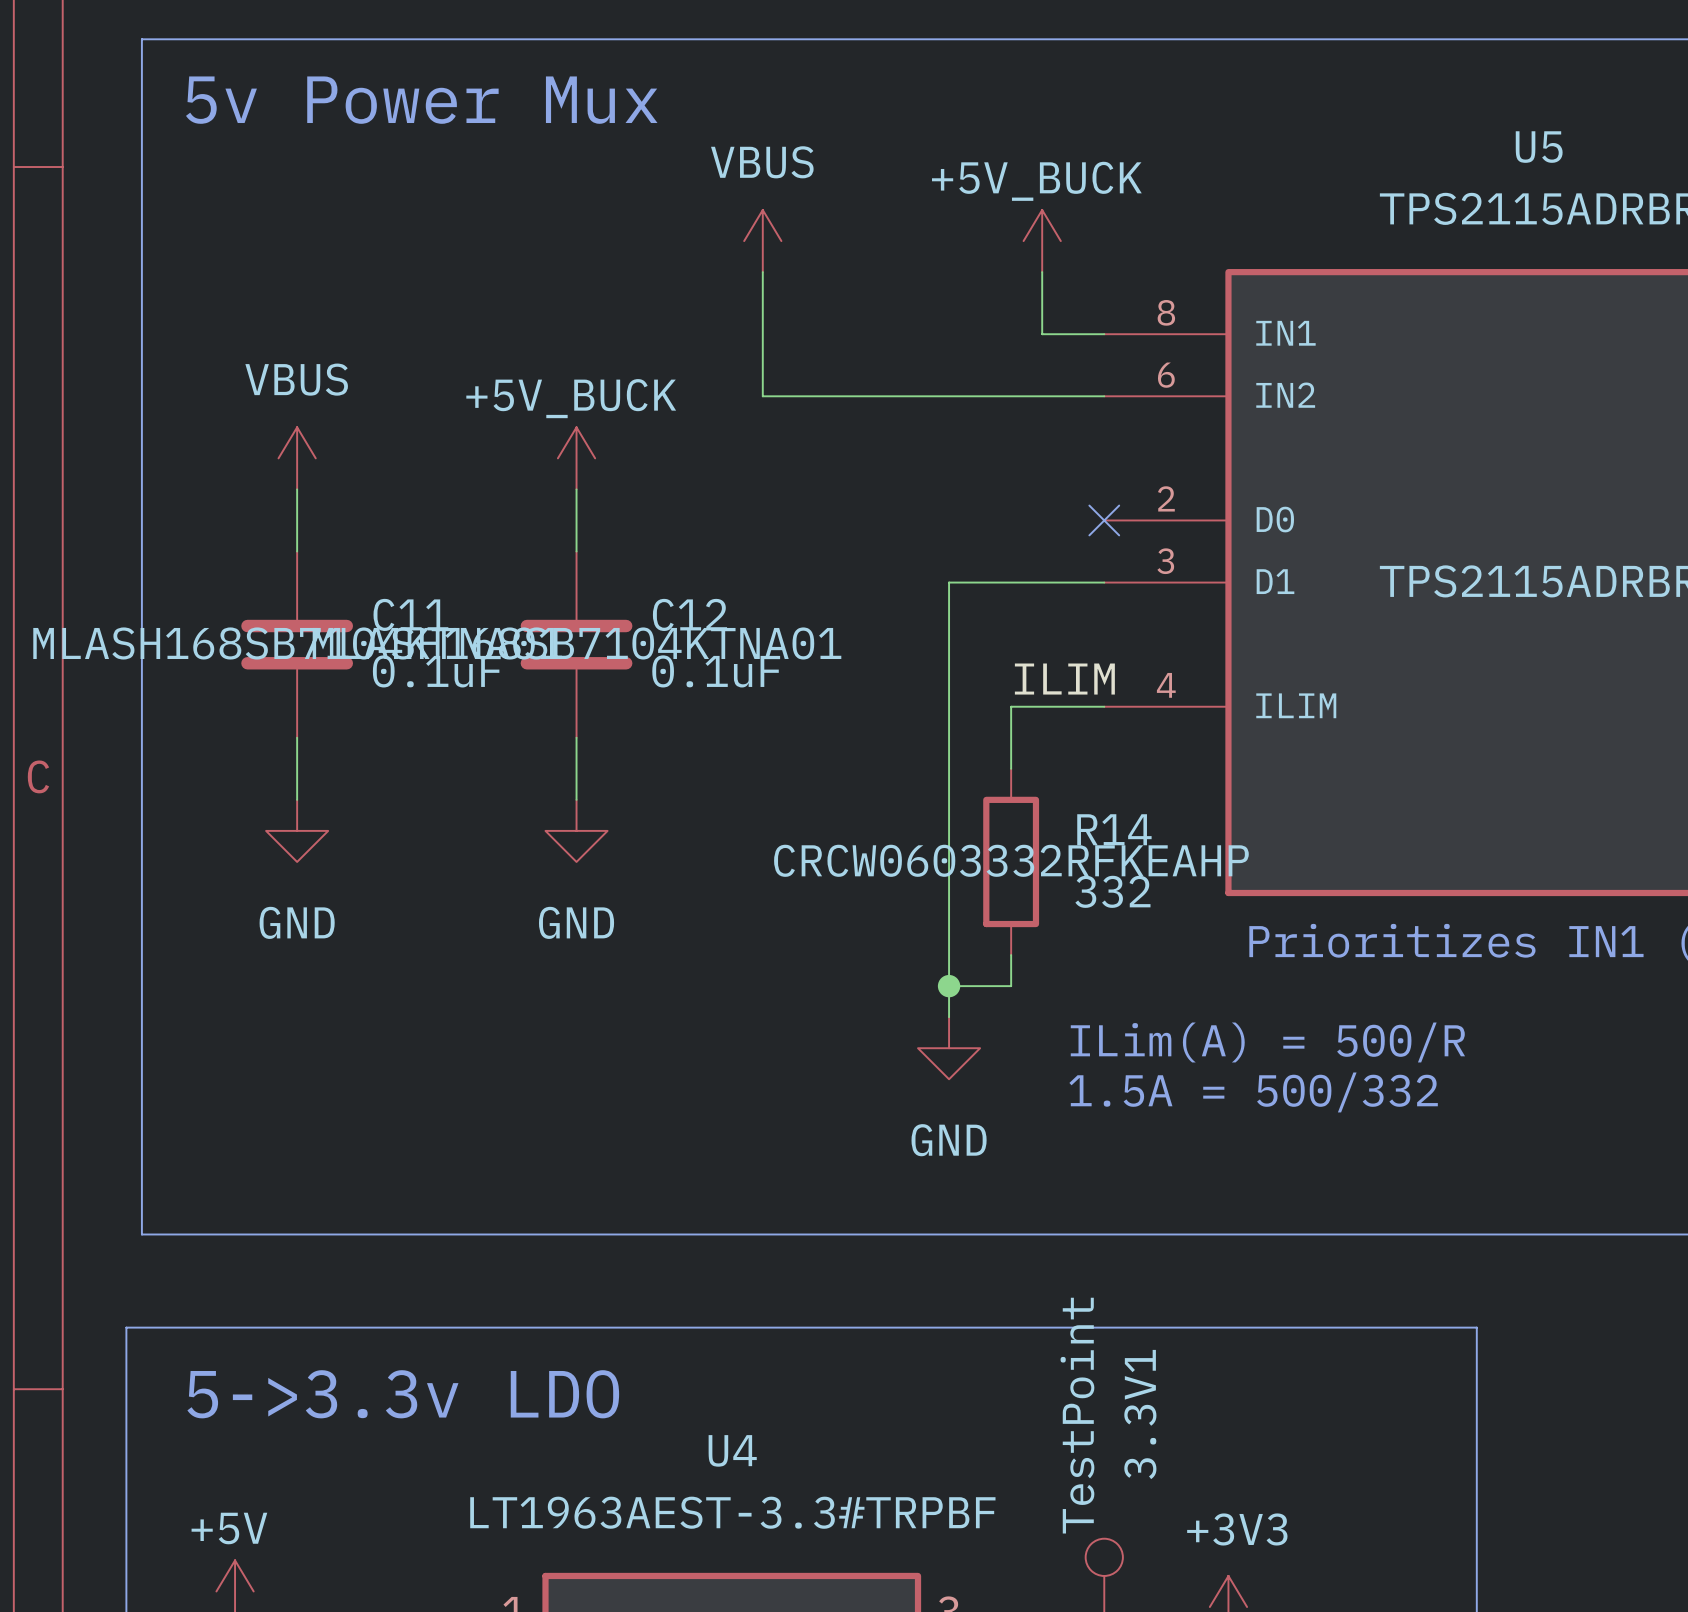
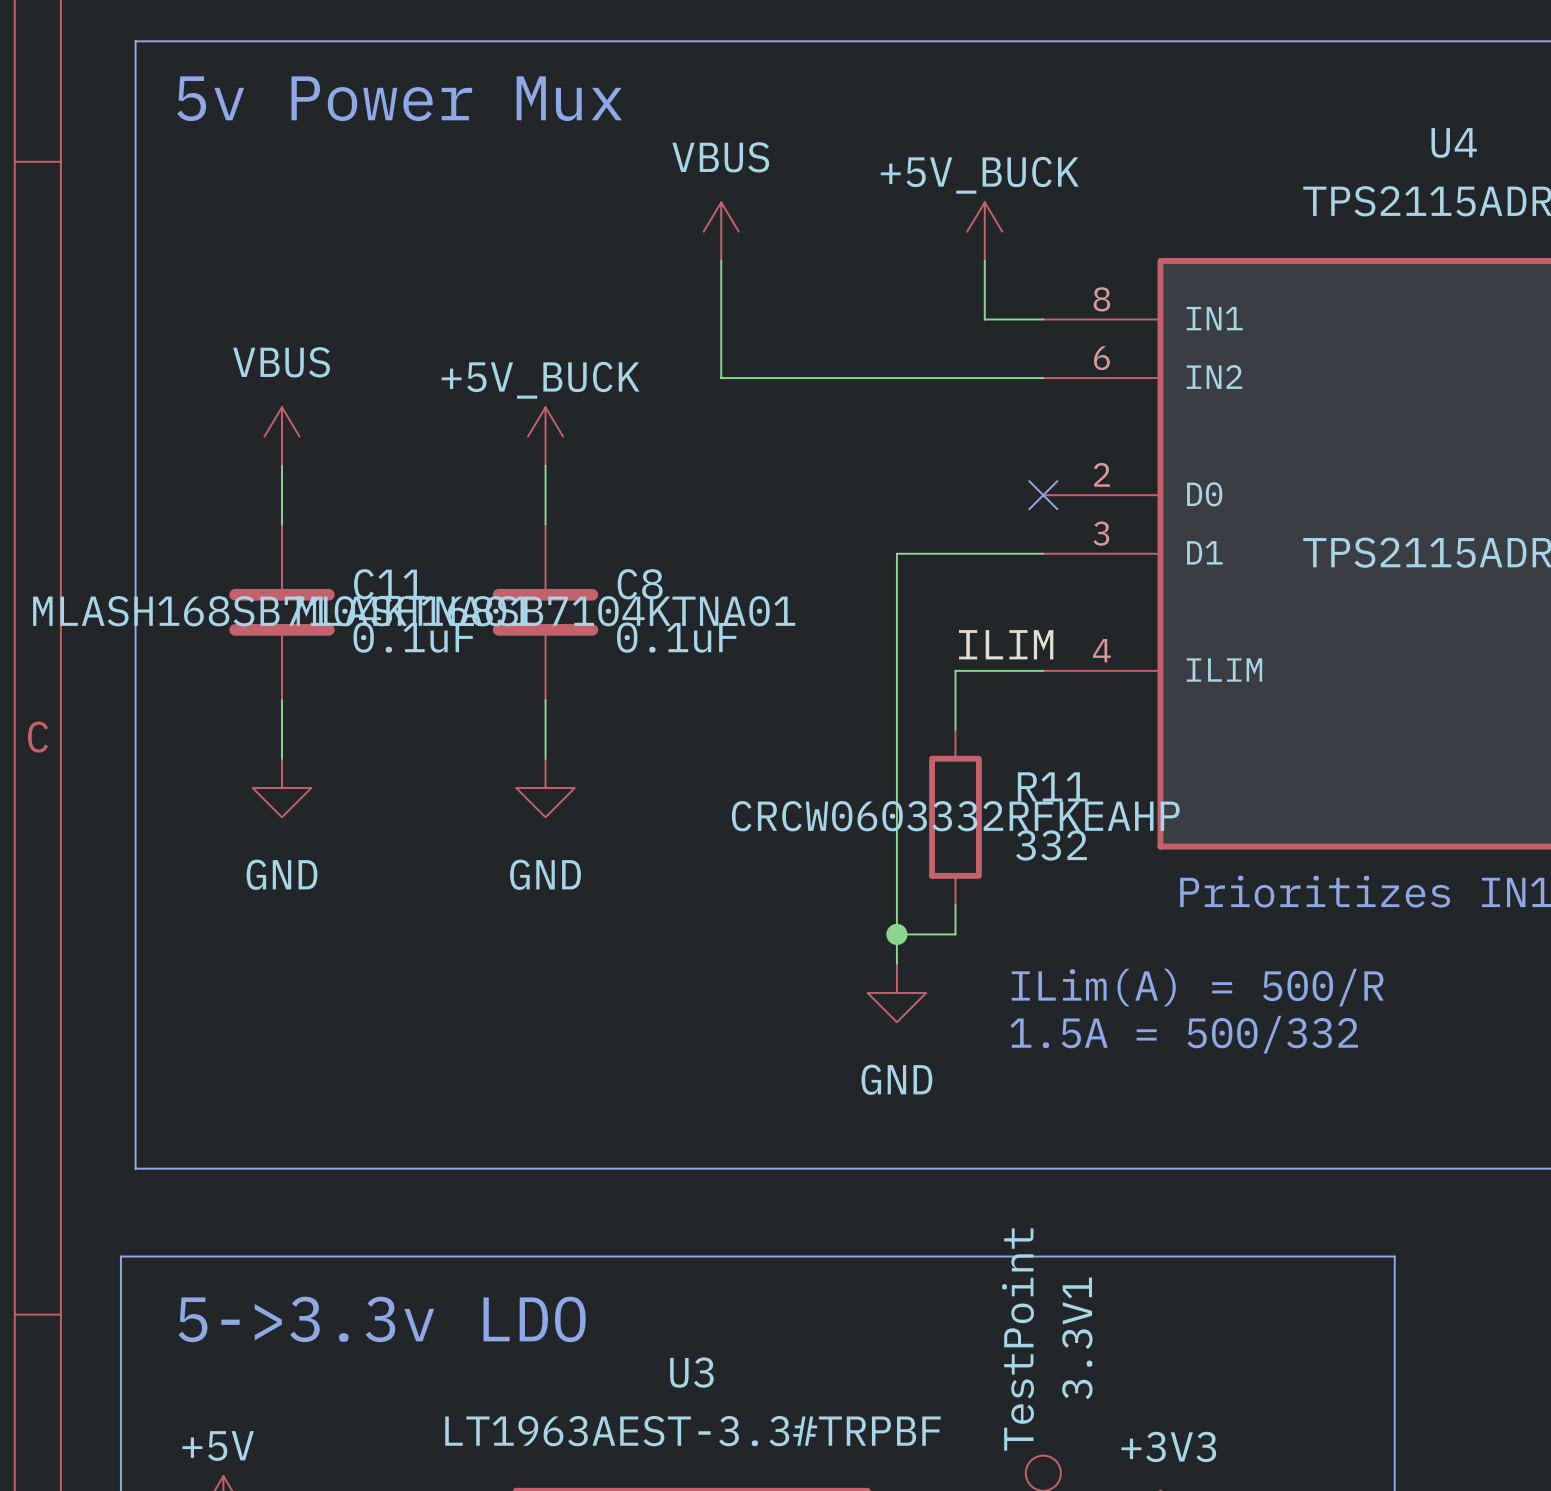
U5 name: U5 (1539, 147) -> U4 (1454, 142)
C12 name: C12 (689, 614) -> C8 (640, 584)
R14 name: R14 (1114, 829) -> R11 (1052, 786)
U4 name: U4 (732, 1450) -> U3 (691, 1372)

